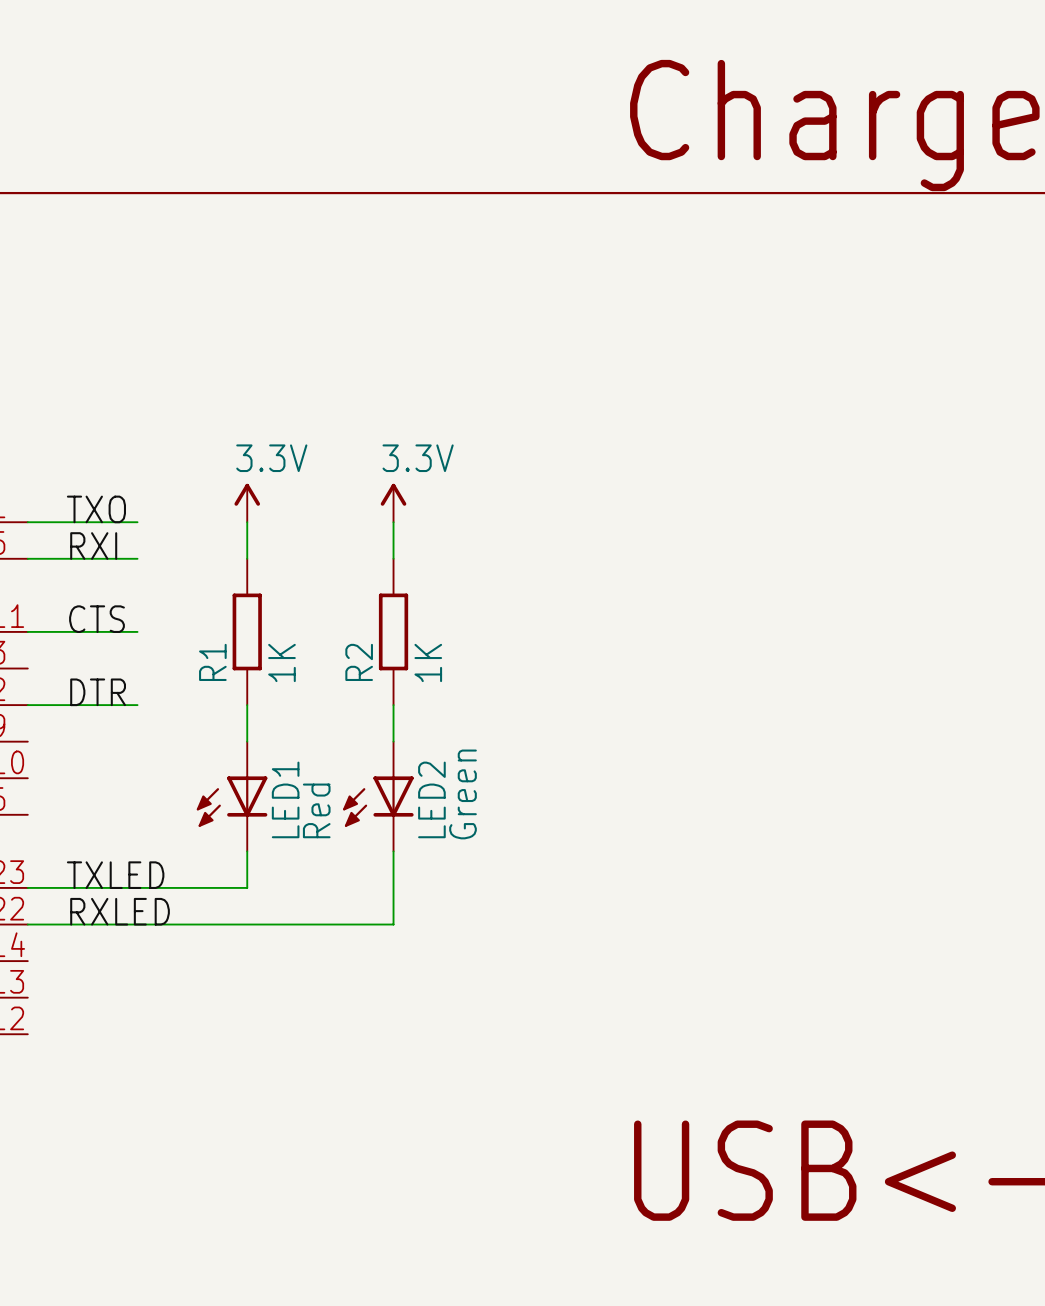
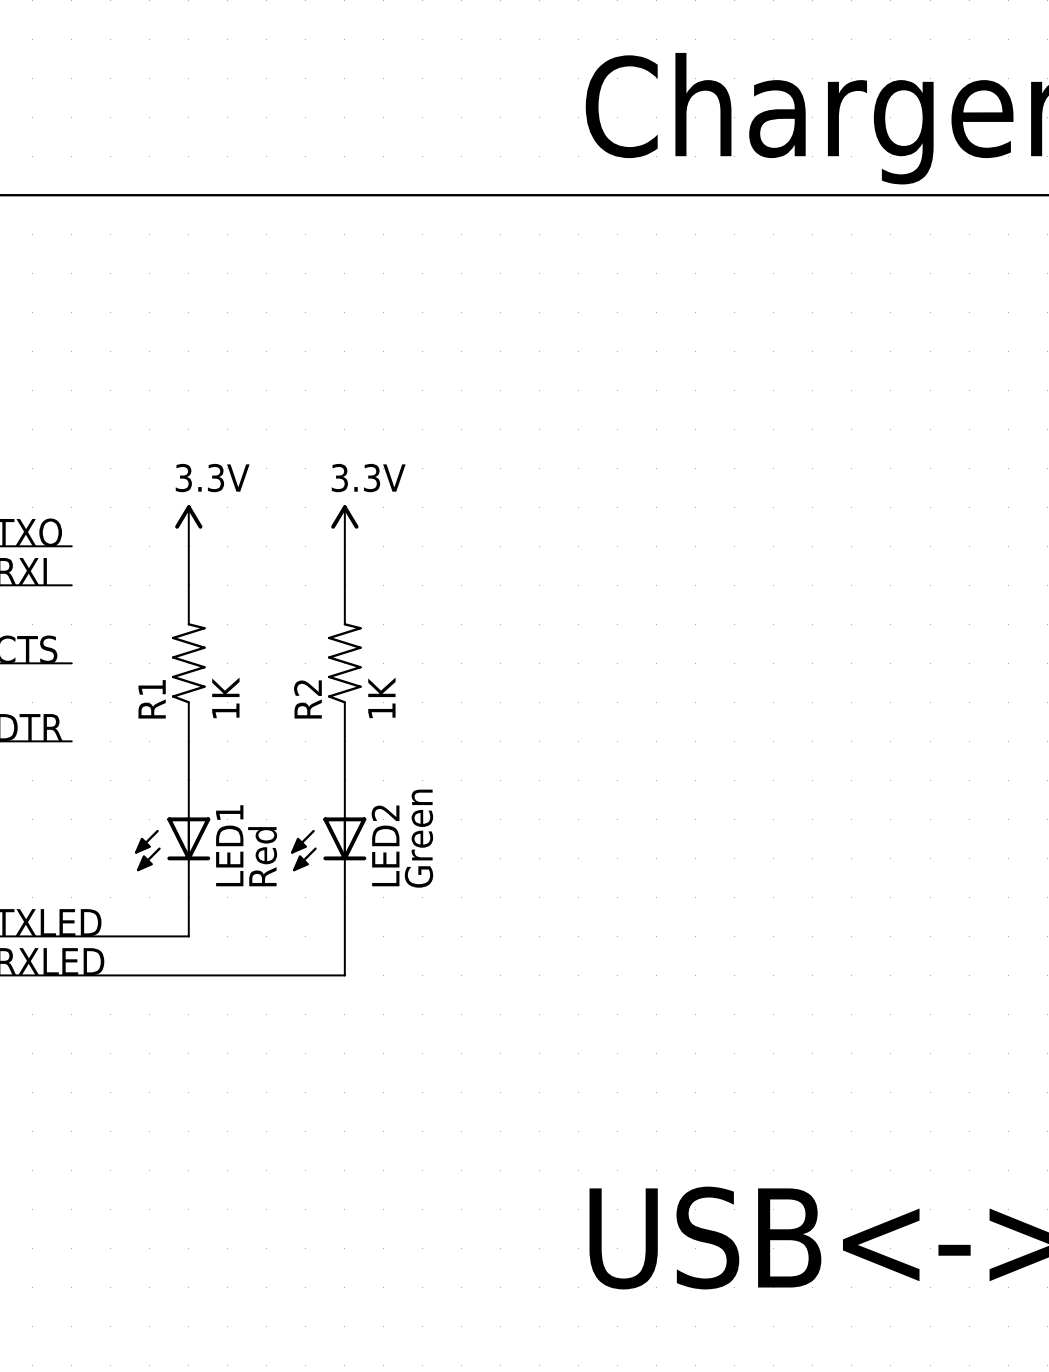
R1 symbol: [232, 558, 262, 706] -> [172, 585, 206, 742]
R2 symbol: [378, 558, 409, 706] -> [328, 585, 362, 742]

